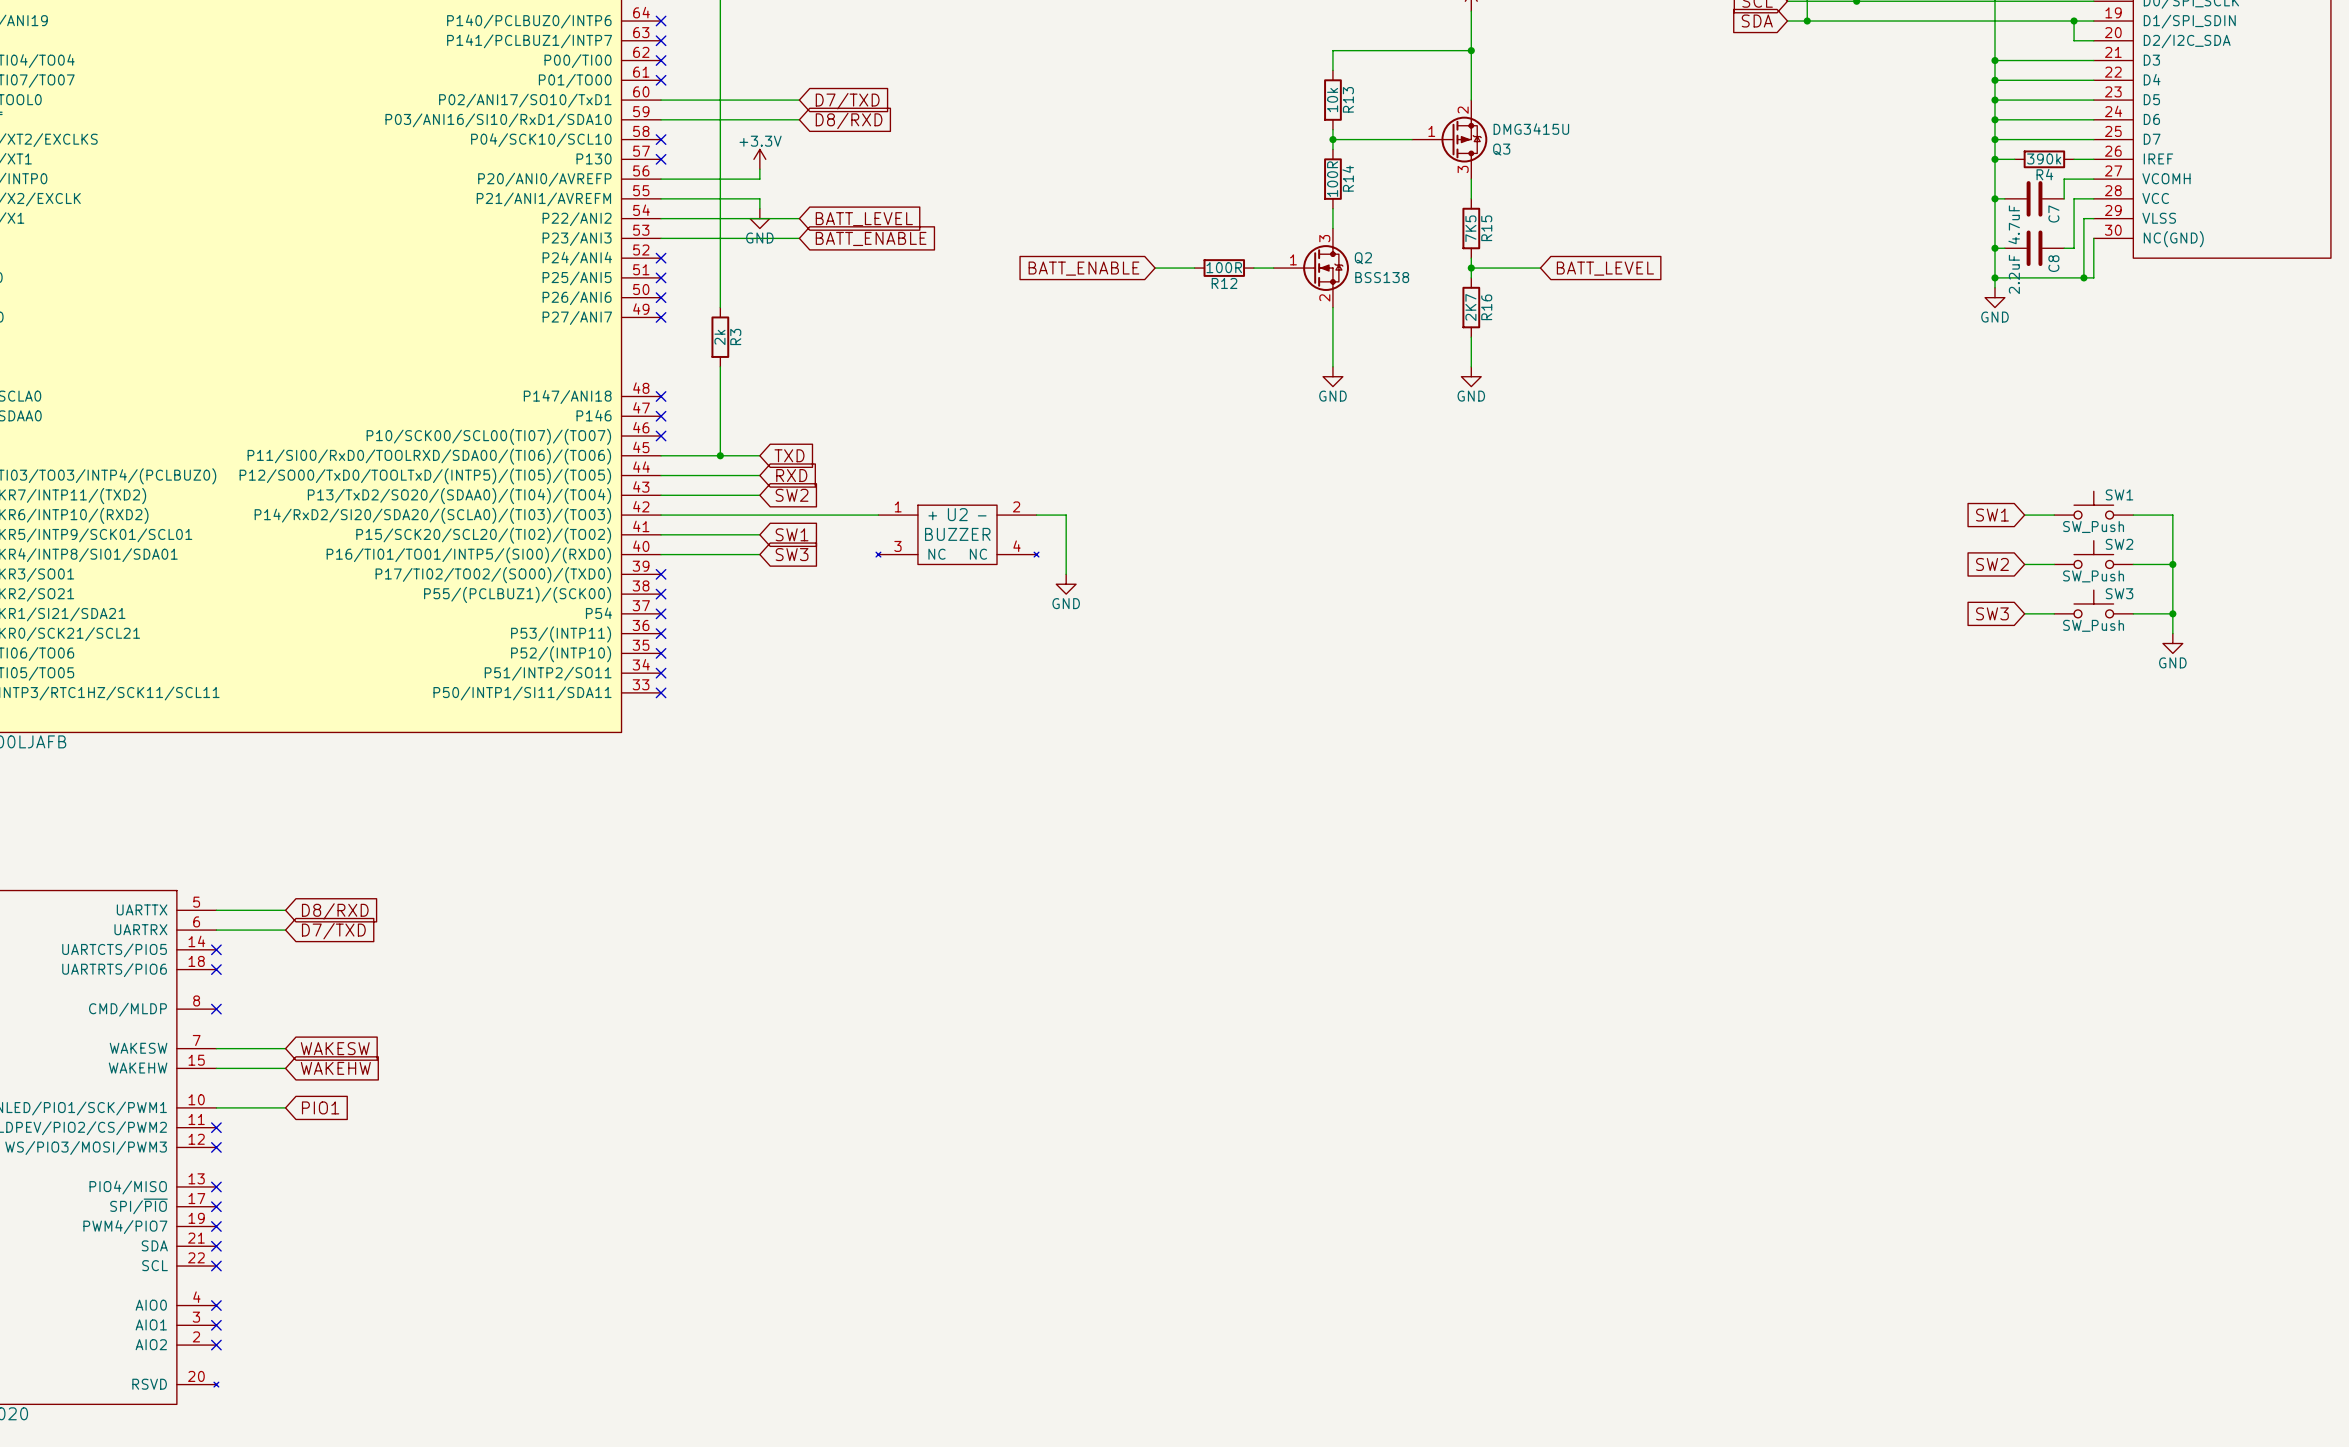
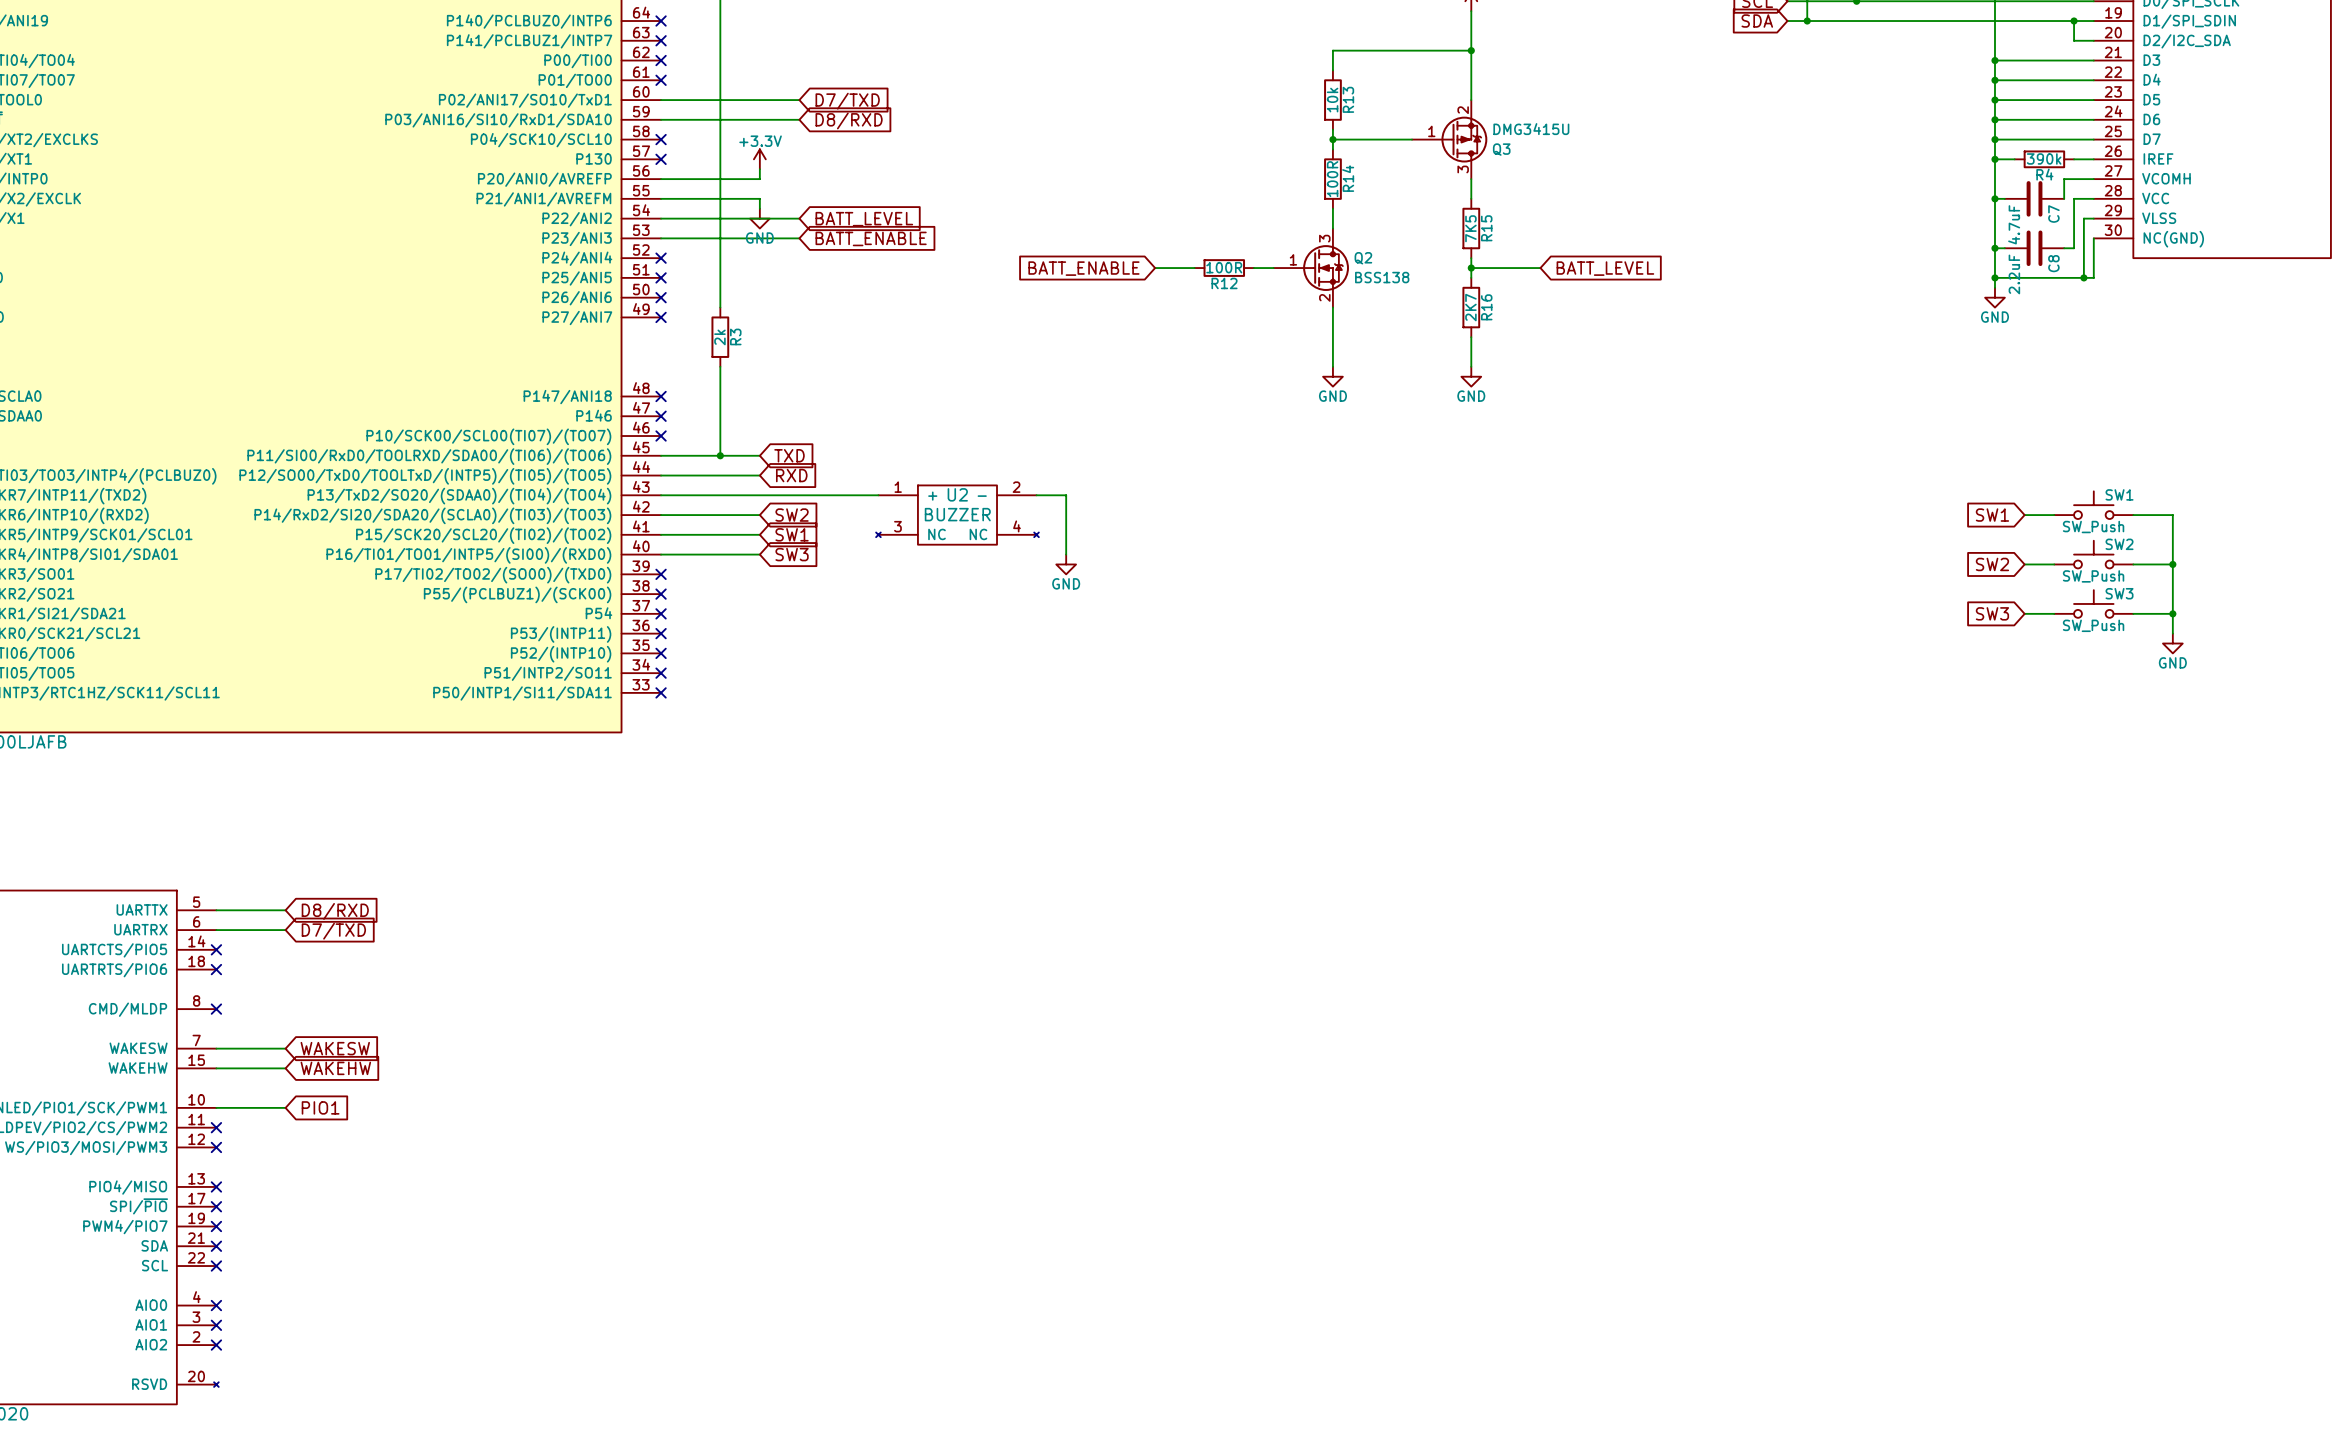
global label position: SW2 (792, 495) -> SW2 (792, 515)
wire: (759, 515) (878, 515) -> (759, 495) (878, 495)
wire: (1036, 515) (1066, 515) -> (1036, 495) (1066, 495) (1066, 515)
U2 position: (957, 534) -> (957, 515)
power symbol position: GND (1066, 584) -> GND (1066, 564)

